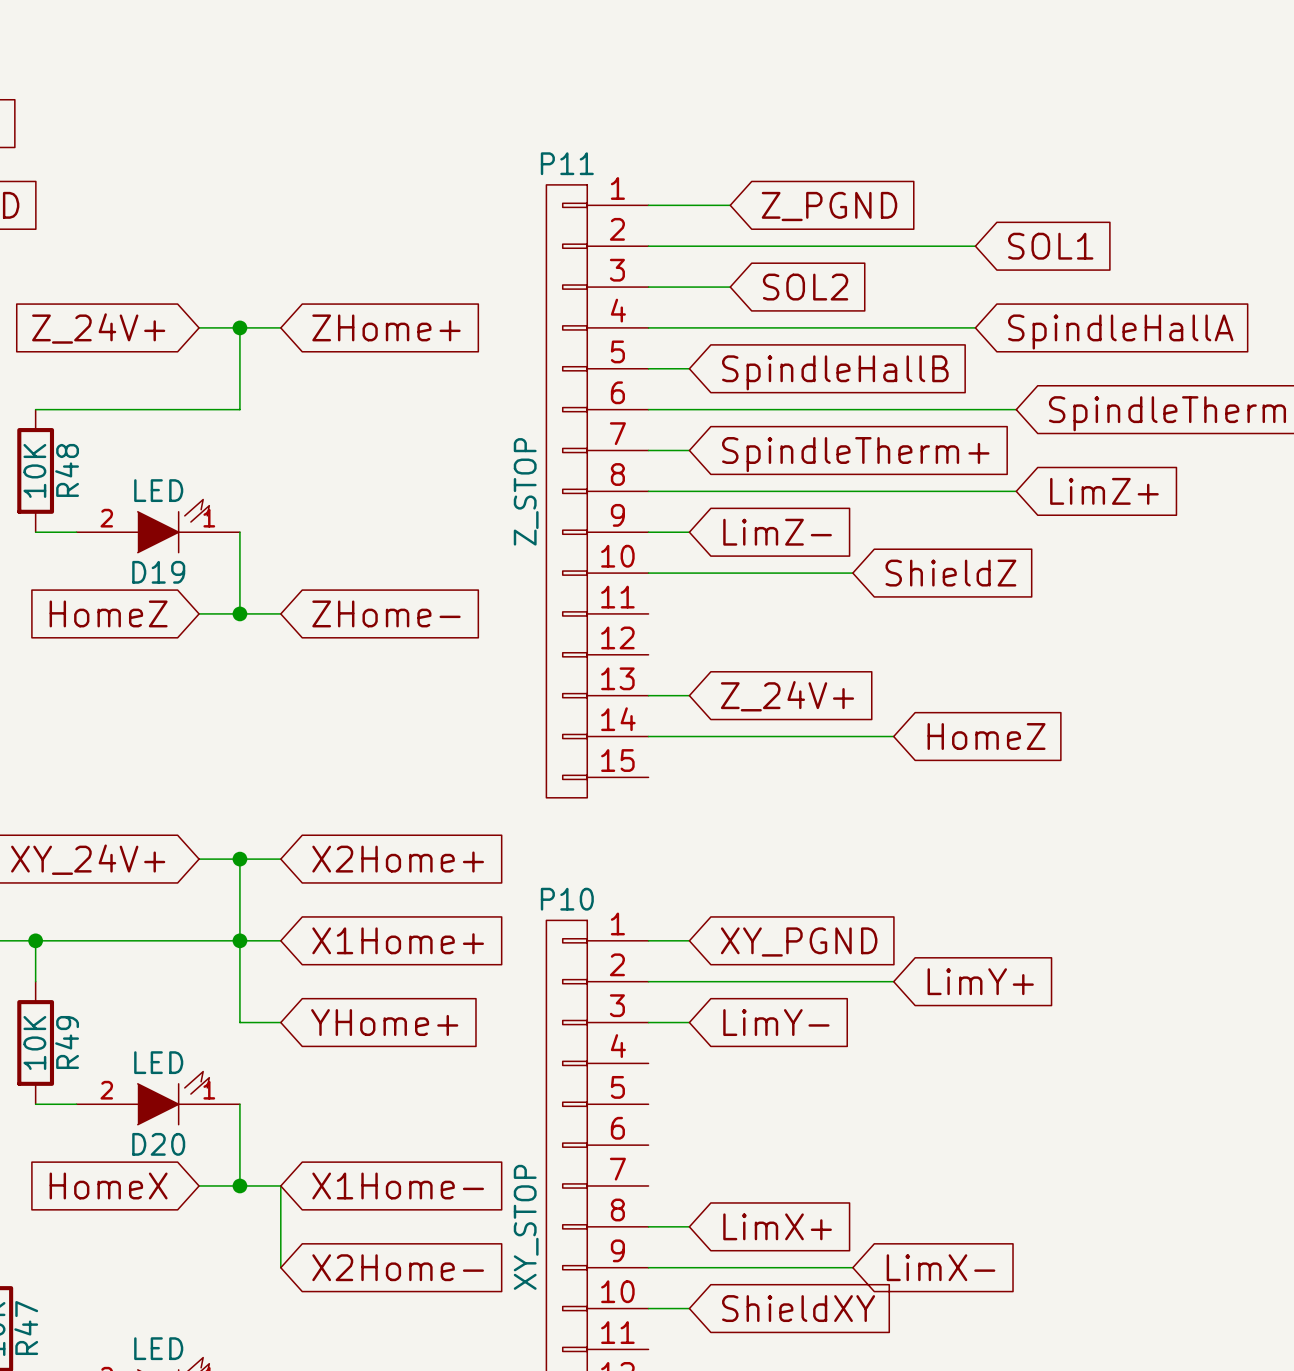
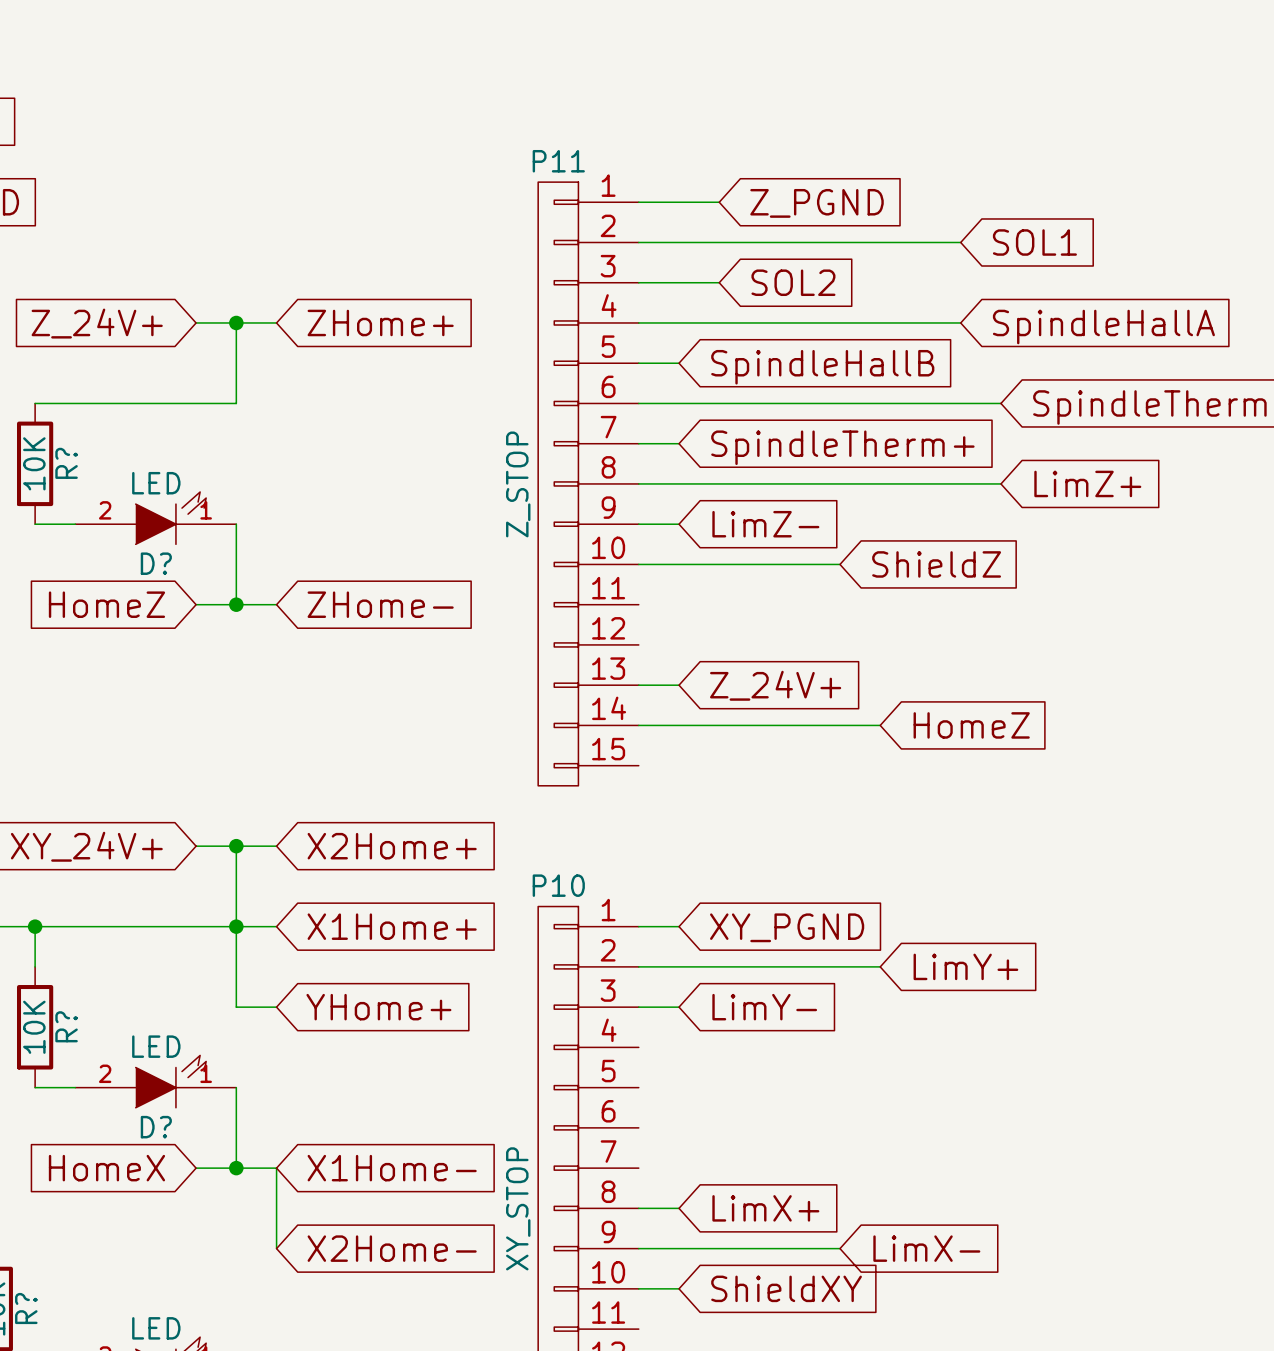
R48 name: R48 (67, 470) -> R? (66, 463)
D19 name: D19 (158, 572) -> D? (156, 563)
R49 name: R49 (67, 1042) -> R? (66, 1026)
D20 name: D20 (158, 1144) -> D? (156, 1127)
R47 name: R47 (26, 1328) -> R? (26, 1308)

